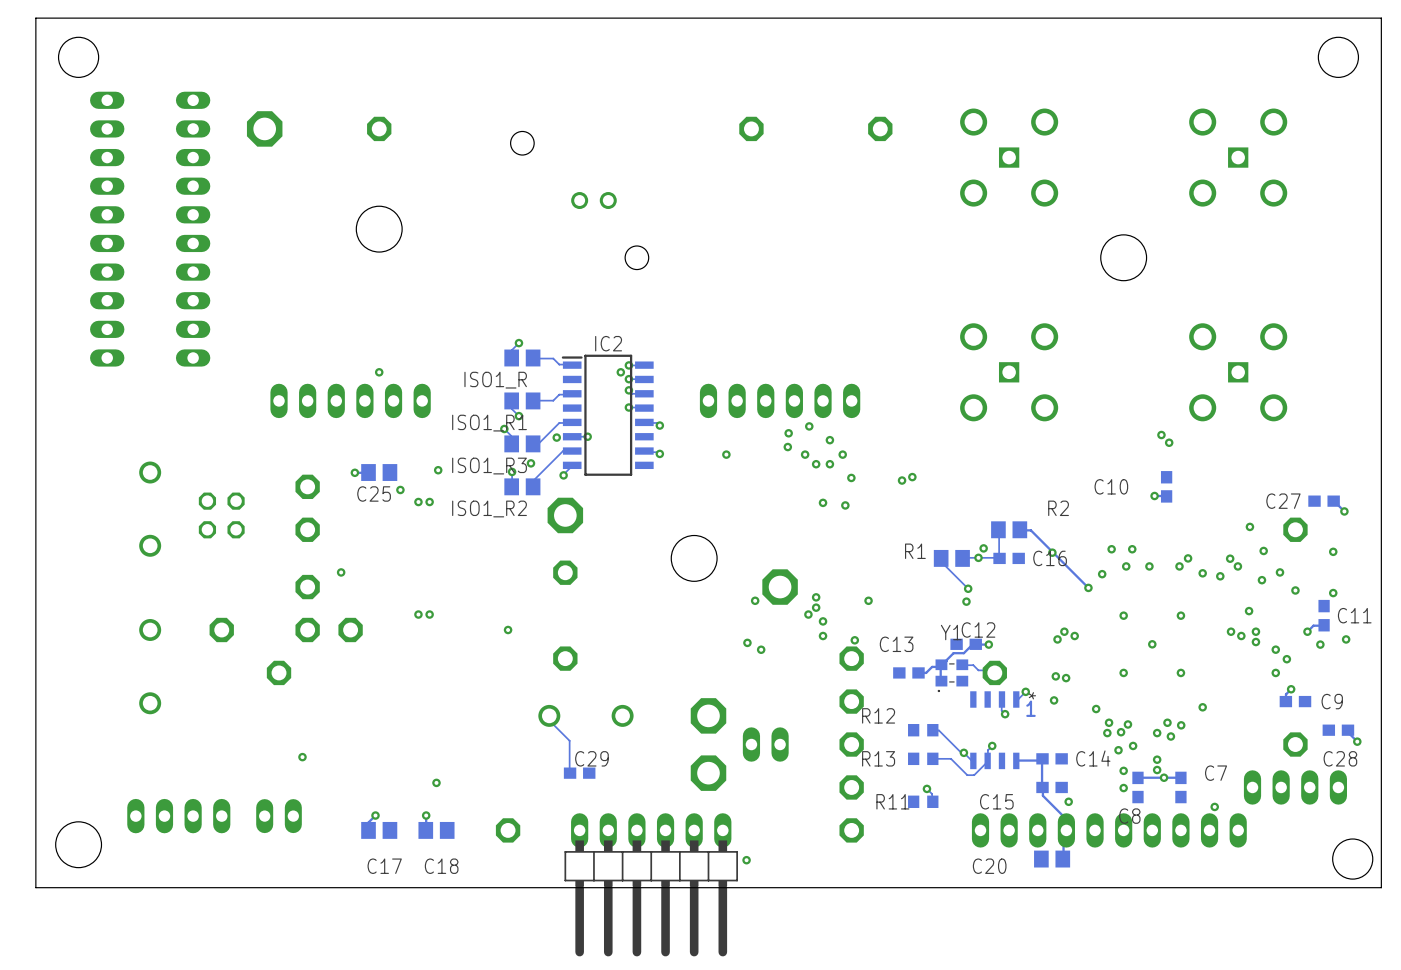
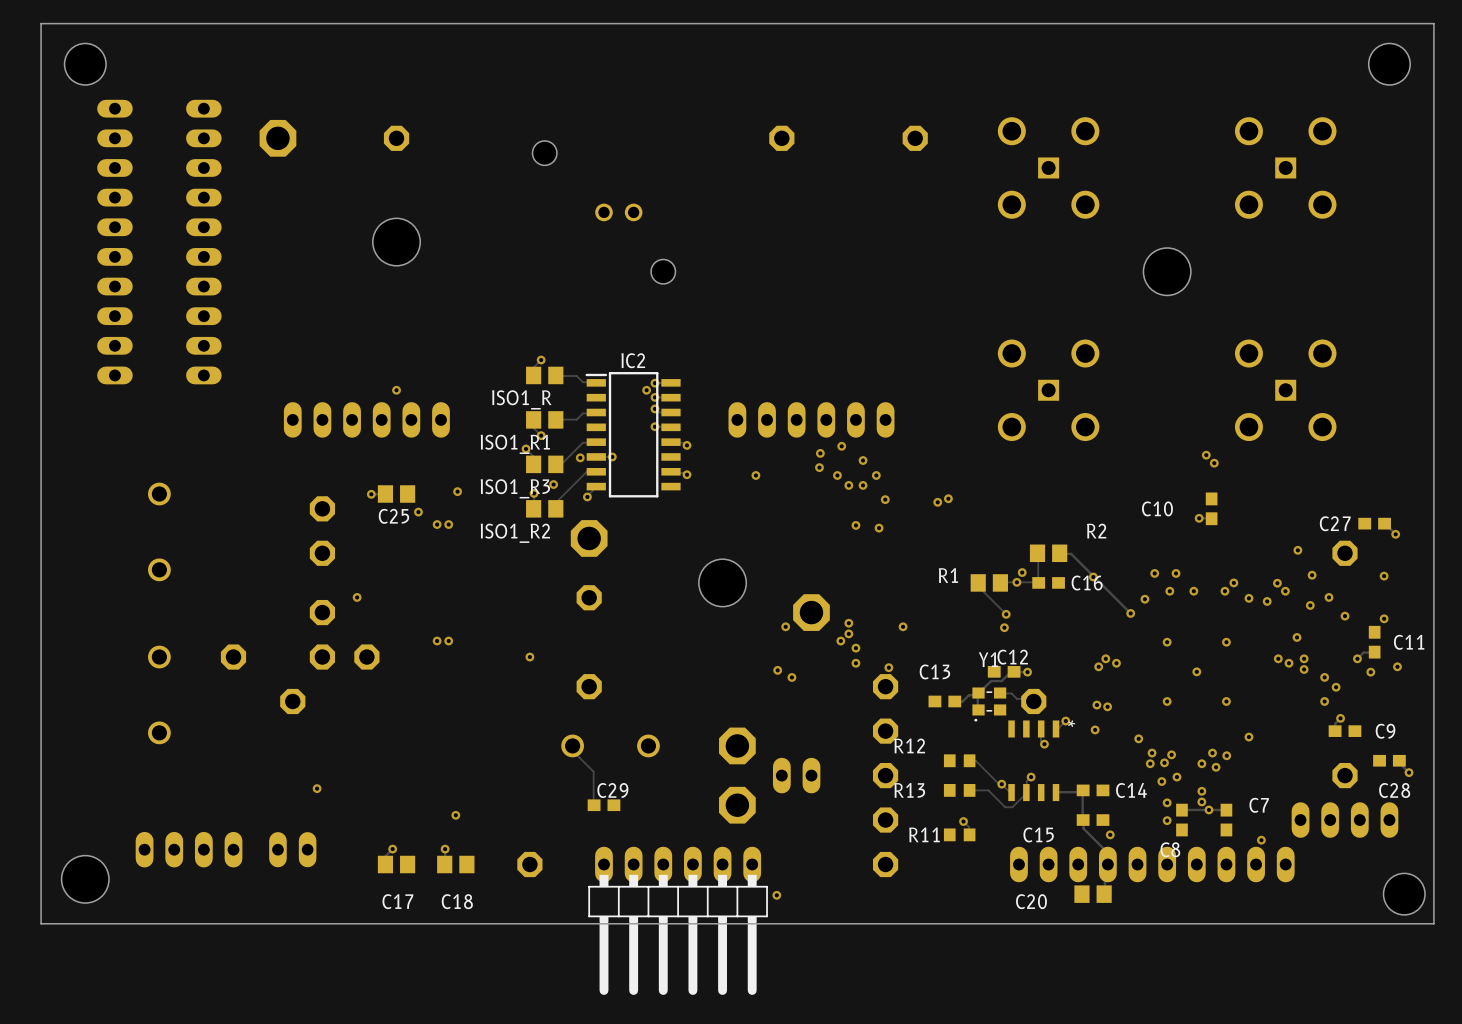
part: (221, 515) -> none
text: 1 (1030, 708) -> none

